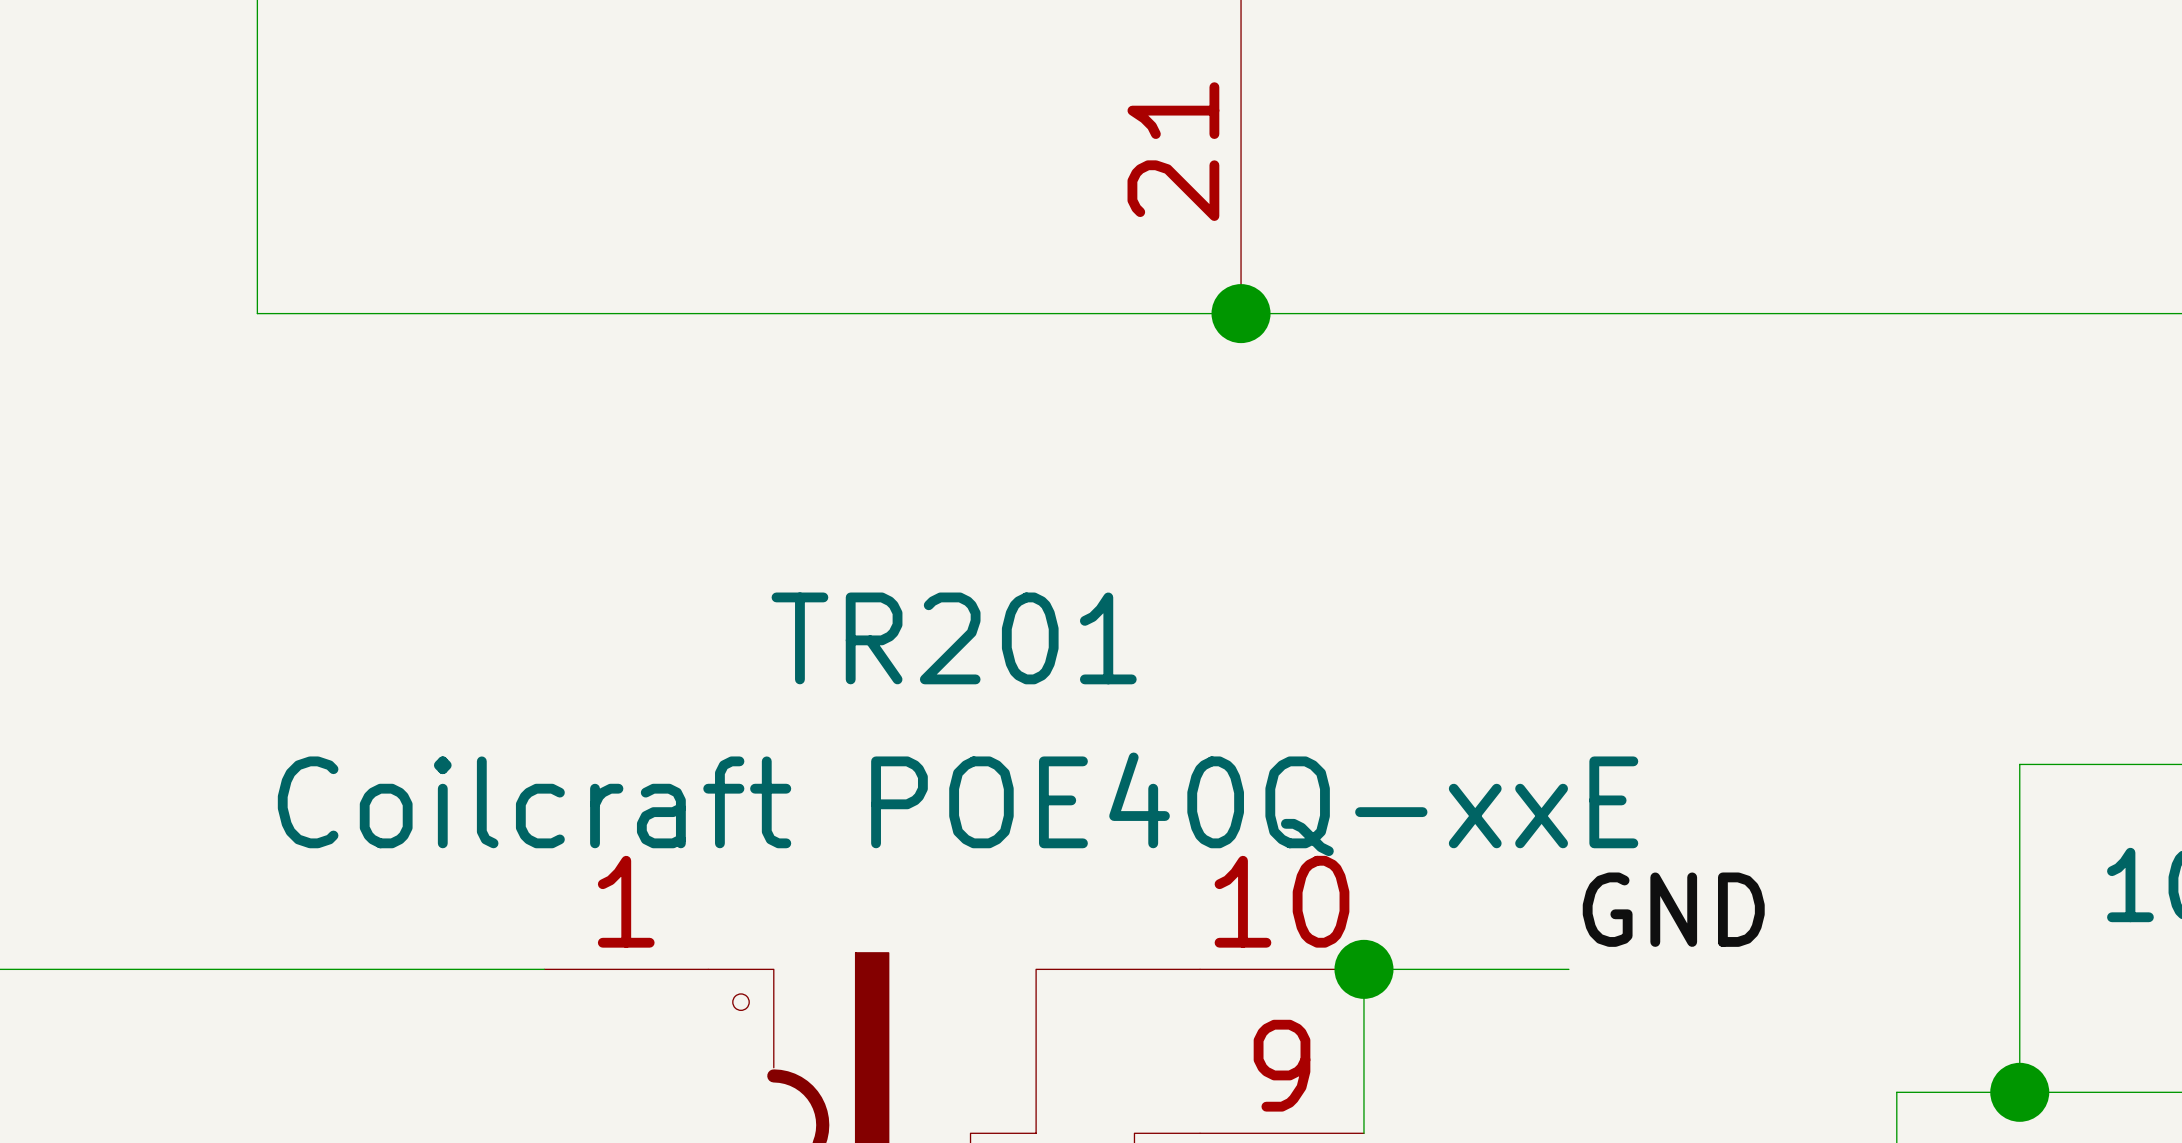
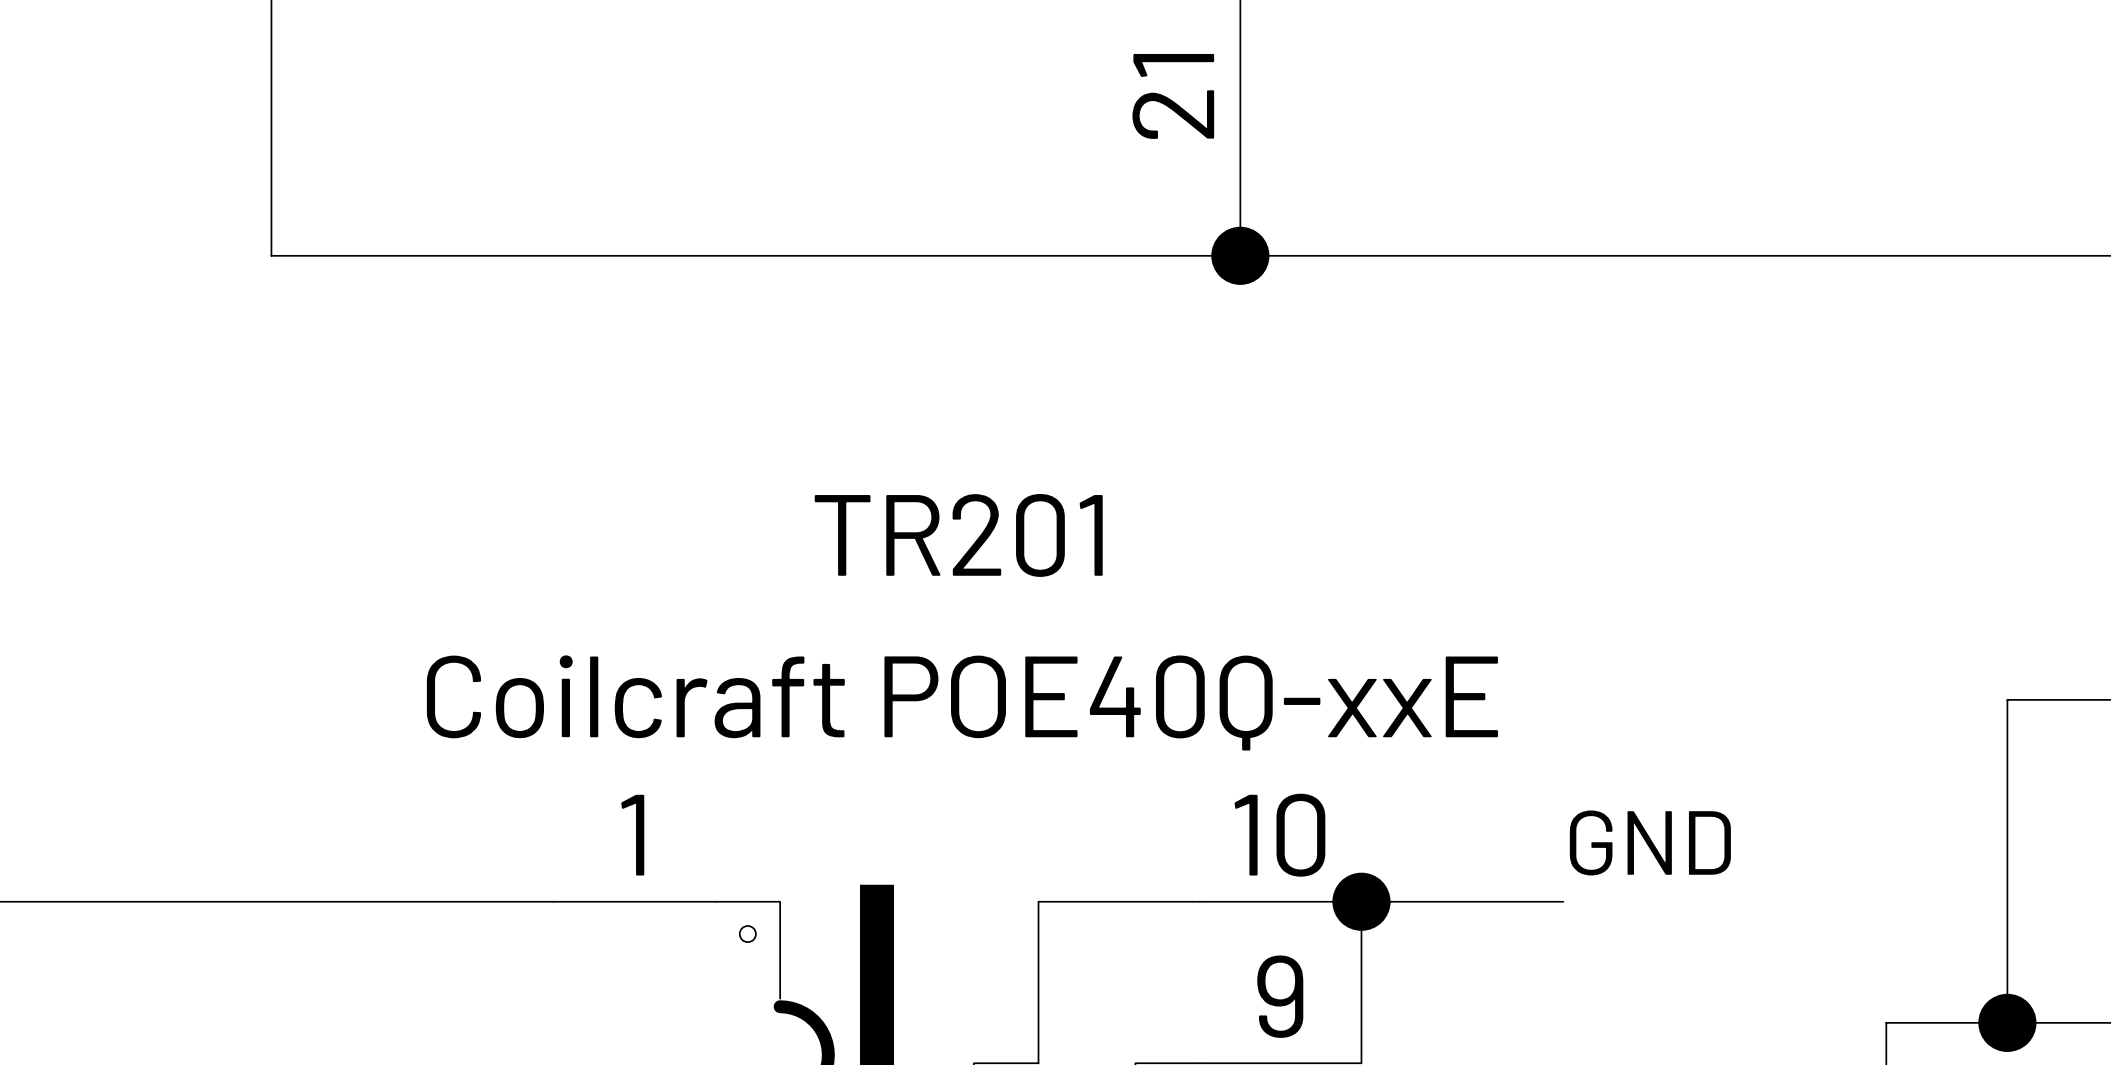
TR201 name position: TR201 (954, 638) -> TR201 (958, 535)
TR201 value position: Coilcraft POE40Q-xxE (958, 804) -> Coilcraft POE40Q-xxE (962, 702)

